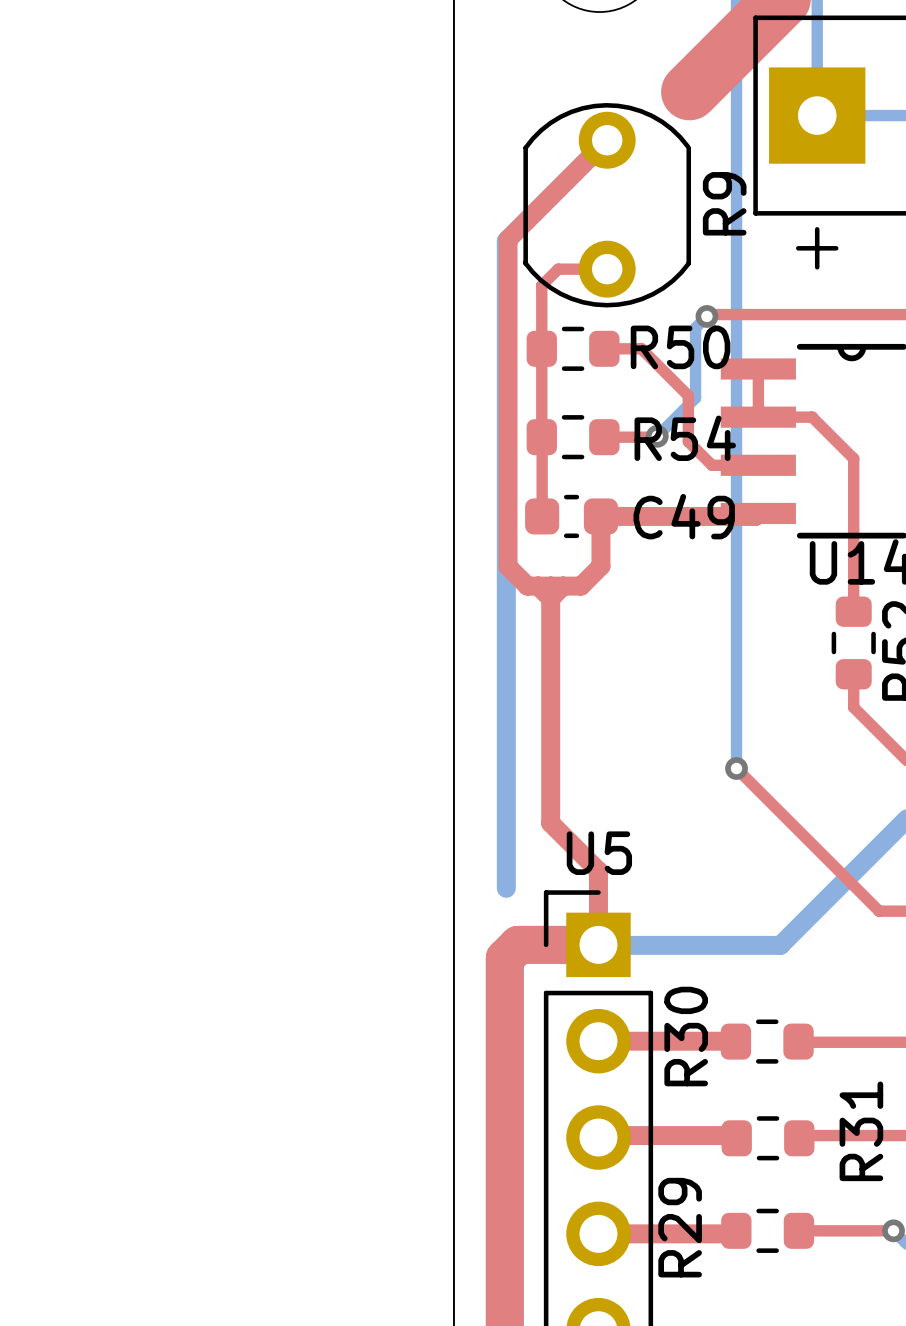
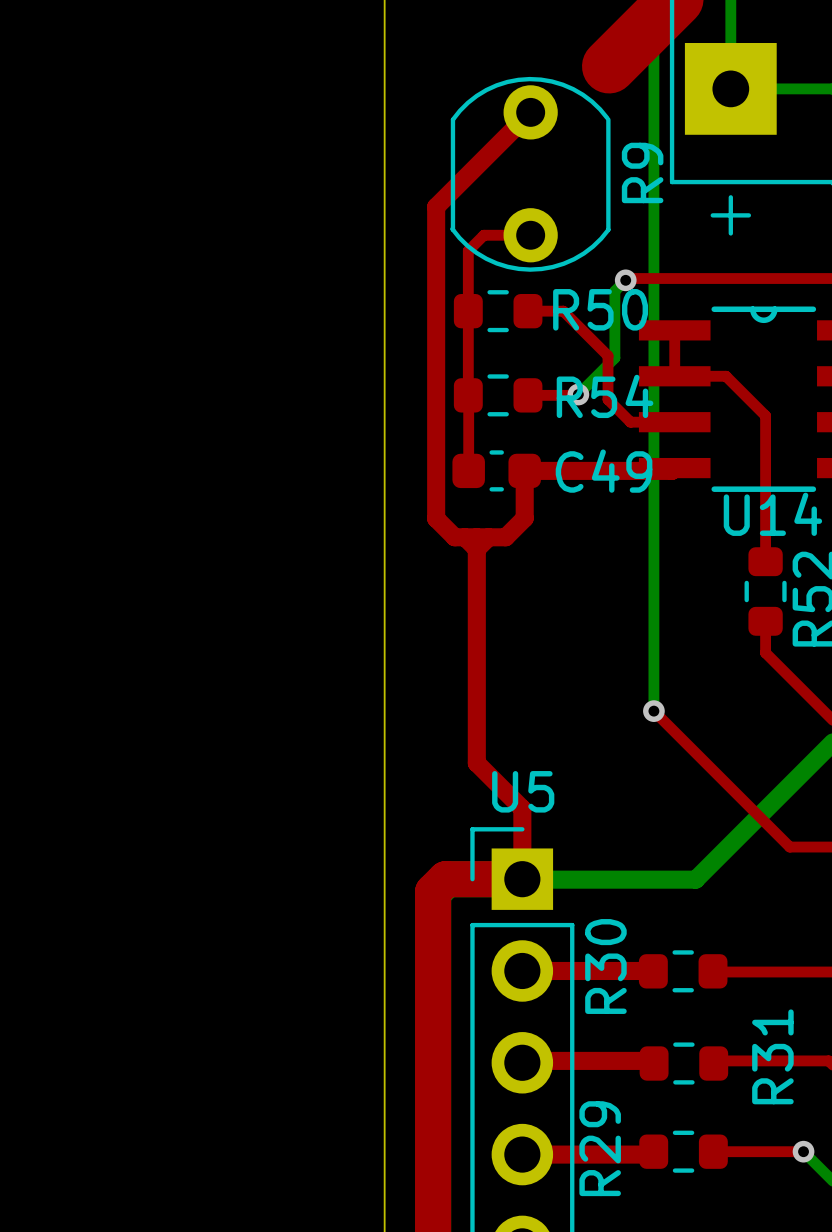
bottom track: (607, 140) (506, 241) (506, 888) -> none

